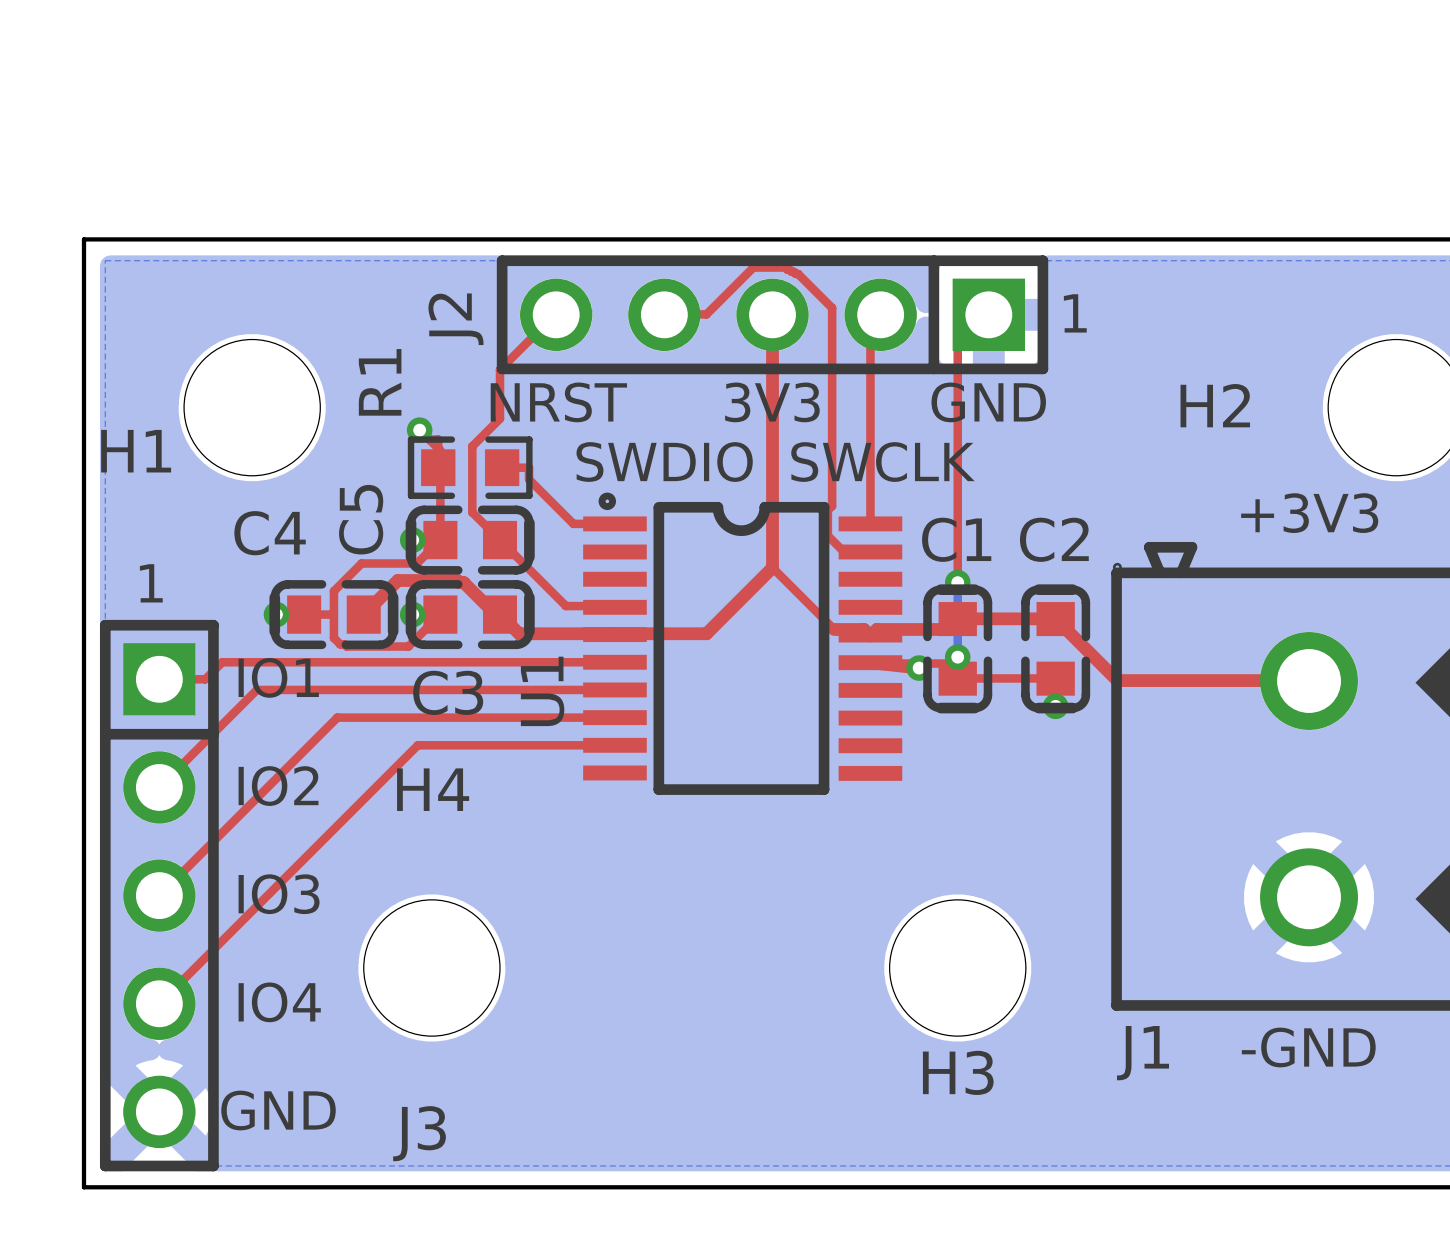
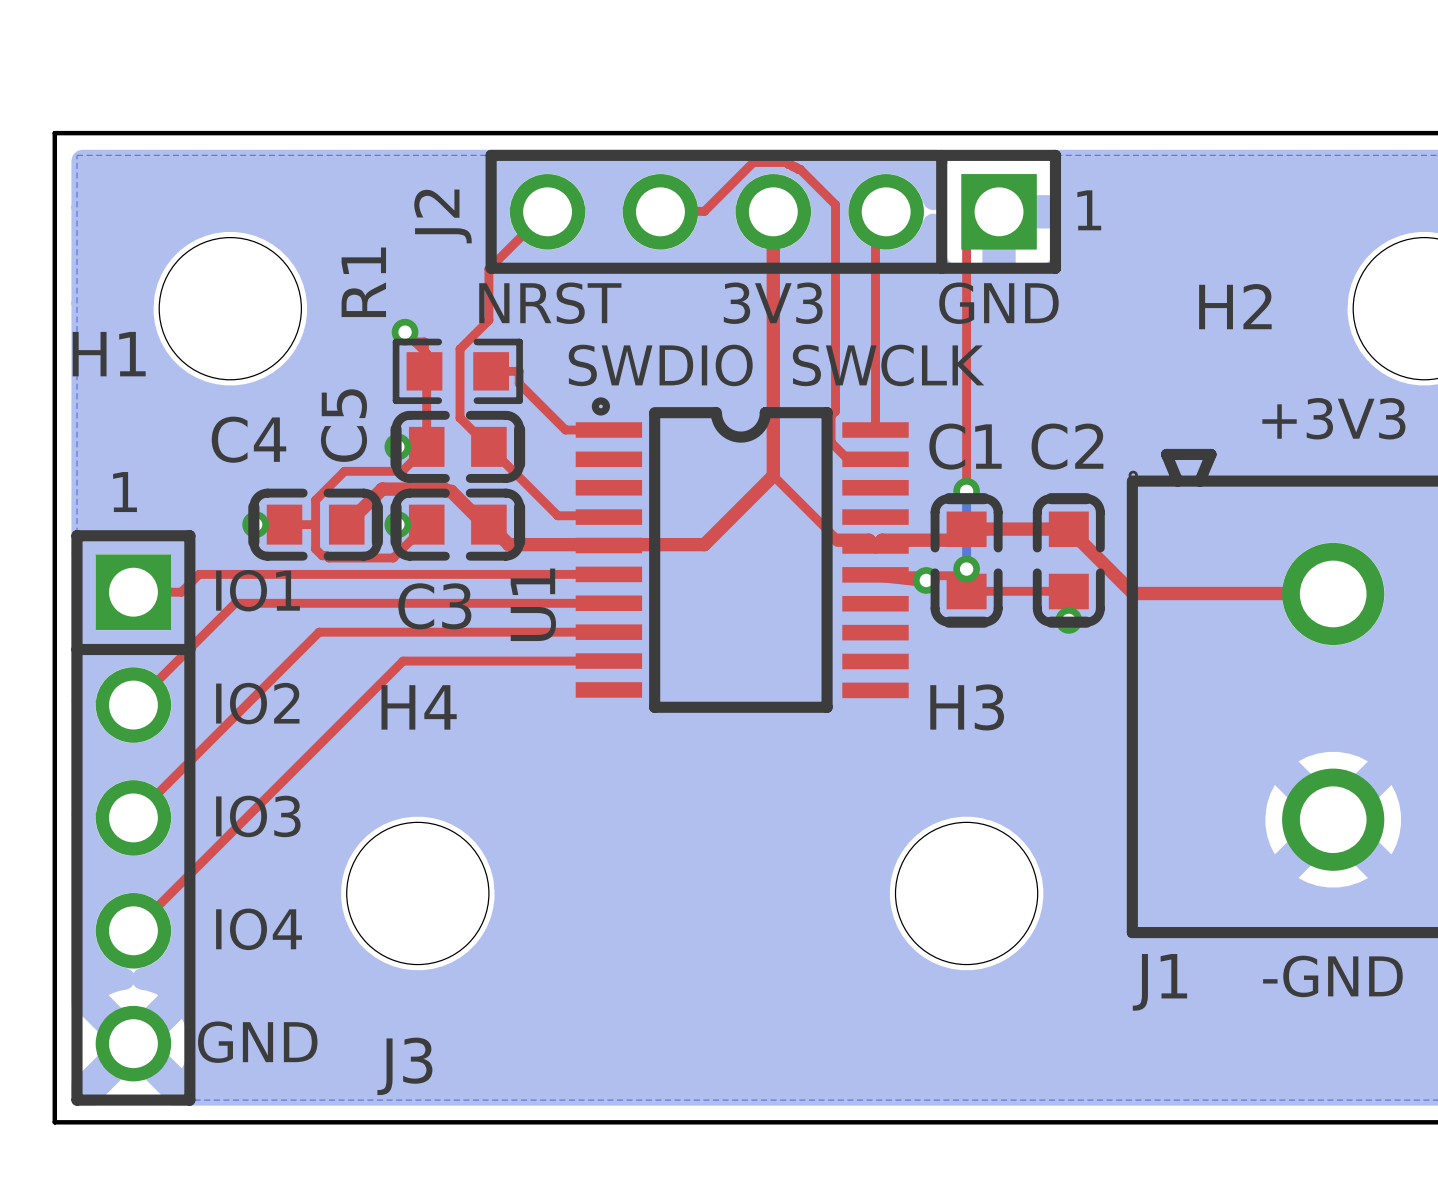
H3 name position: H3 (958, 1072) -> H3 (967, 707)

